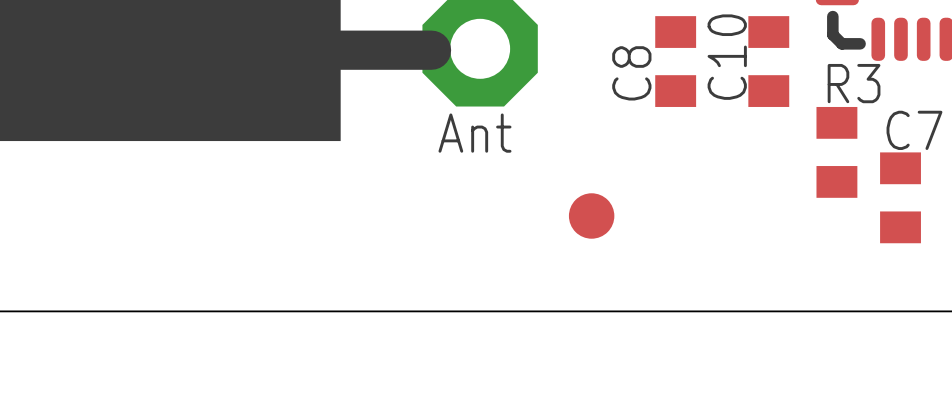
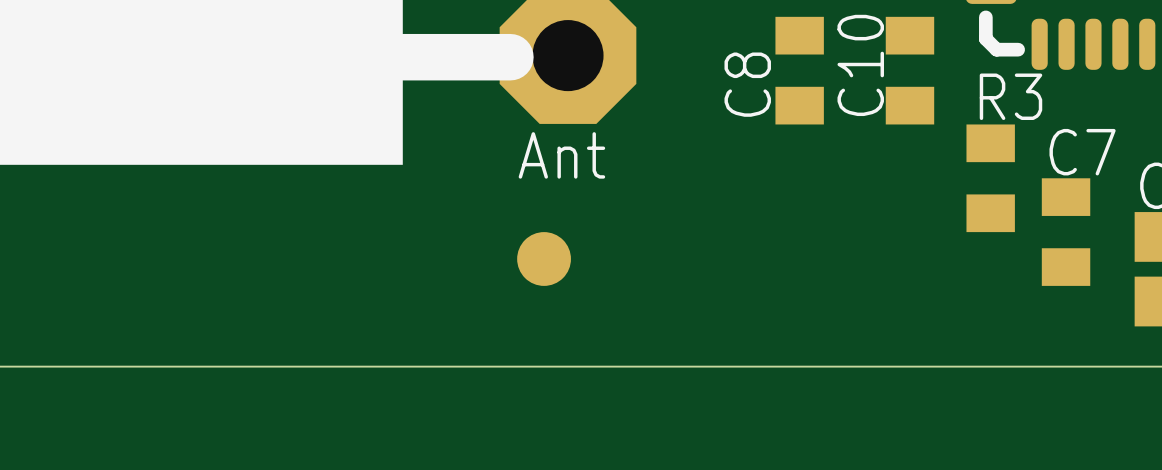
part position: (591, 215) -> (544, 259)

